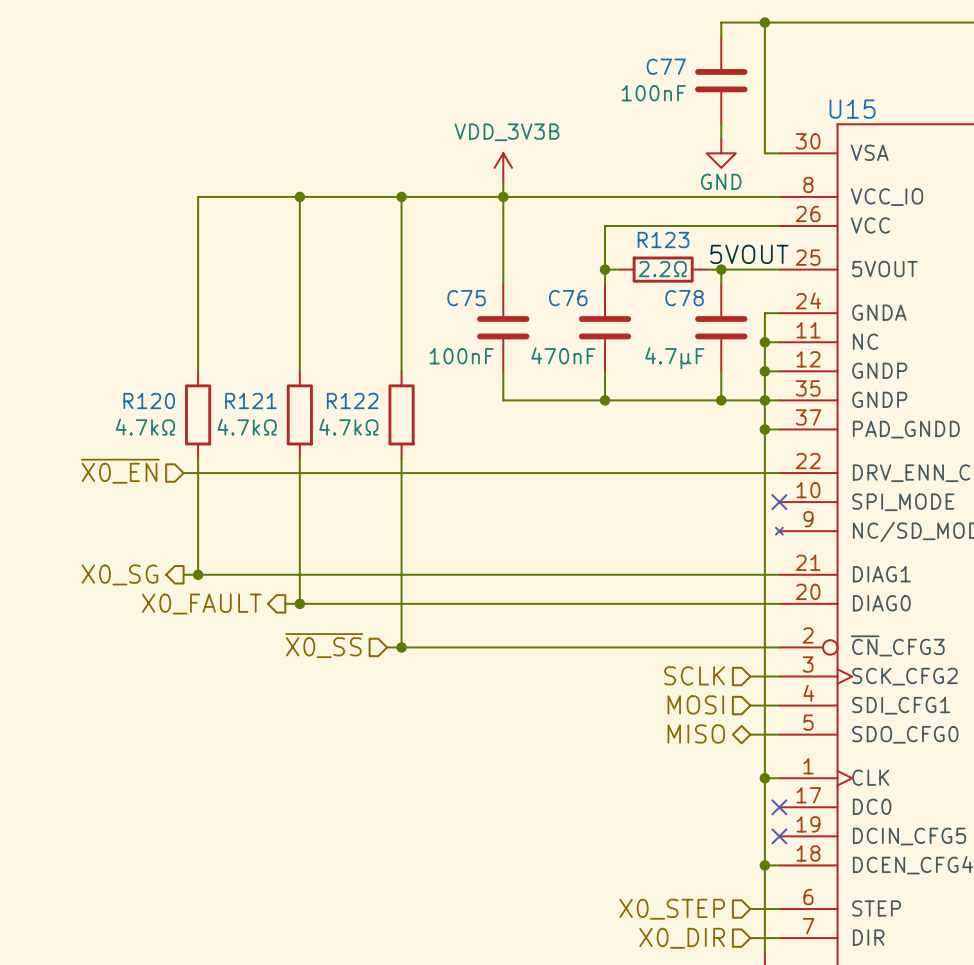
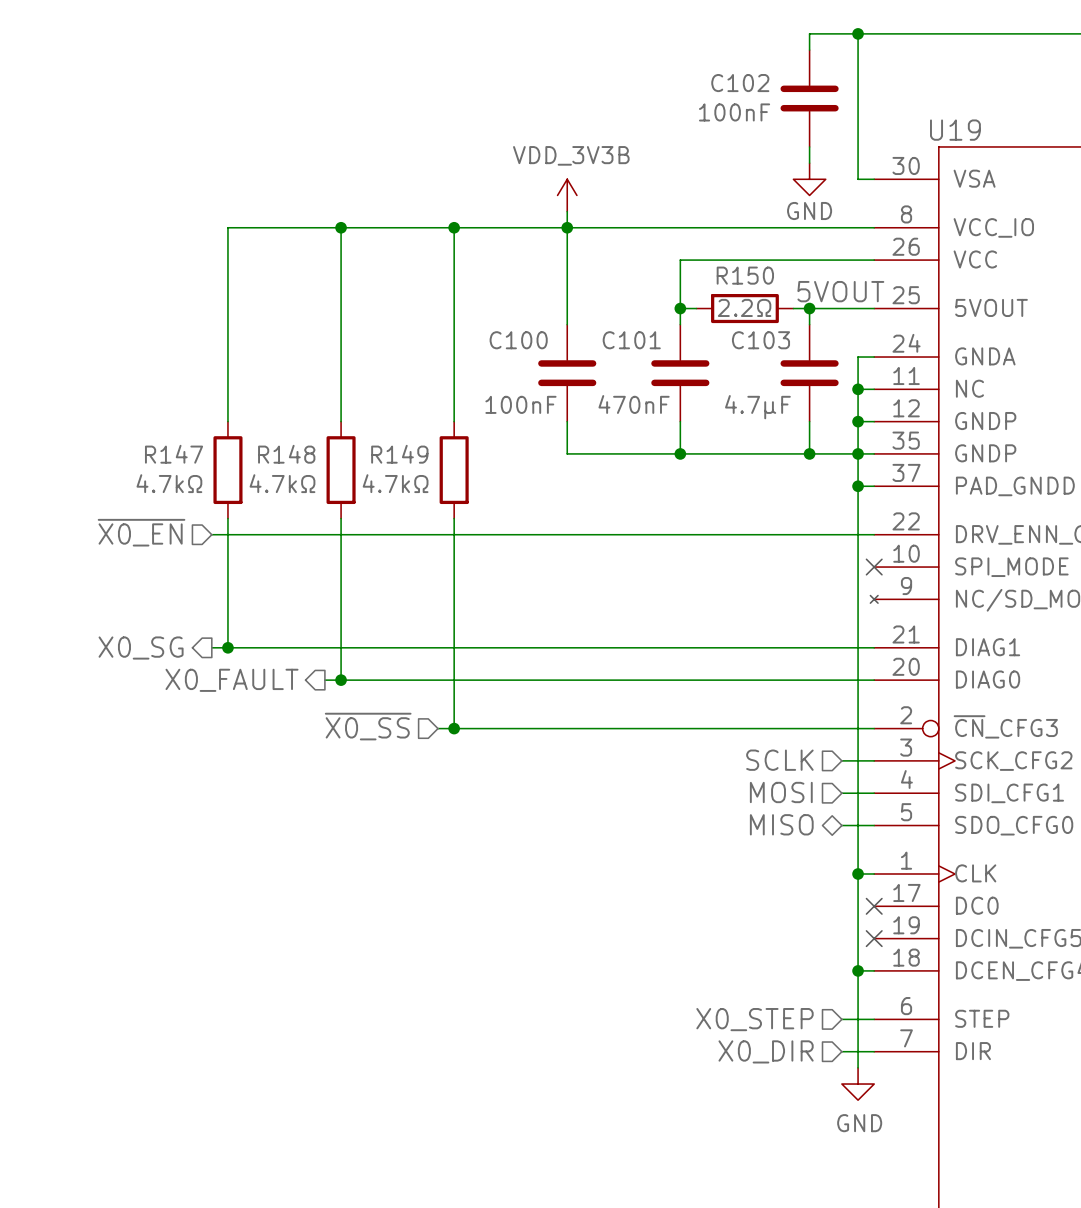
C77 name: C77 (666, 66) -> C102 (740, 83)
U15 name: U15 (852, 109) -> U19 (955, 130)
R123 name: R123 (663, 239) -> R150 (745, 275)
C75 name: C75 (466, 298) -> C100 (518, 340)
C76 name: C76 (568, 298) -> C101 (631, 340)
C78 name: C78 (684, 298) -> C103 (760, 340)
R120 name: R120 (149, 401) -> R147 (174, 454)
R121 name: R121 (250, 401) -> R148 (286, 454)
R122 name: R122 (352, 401) -> R149 (399, 454)

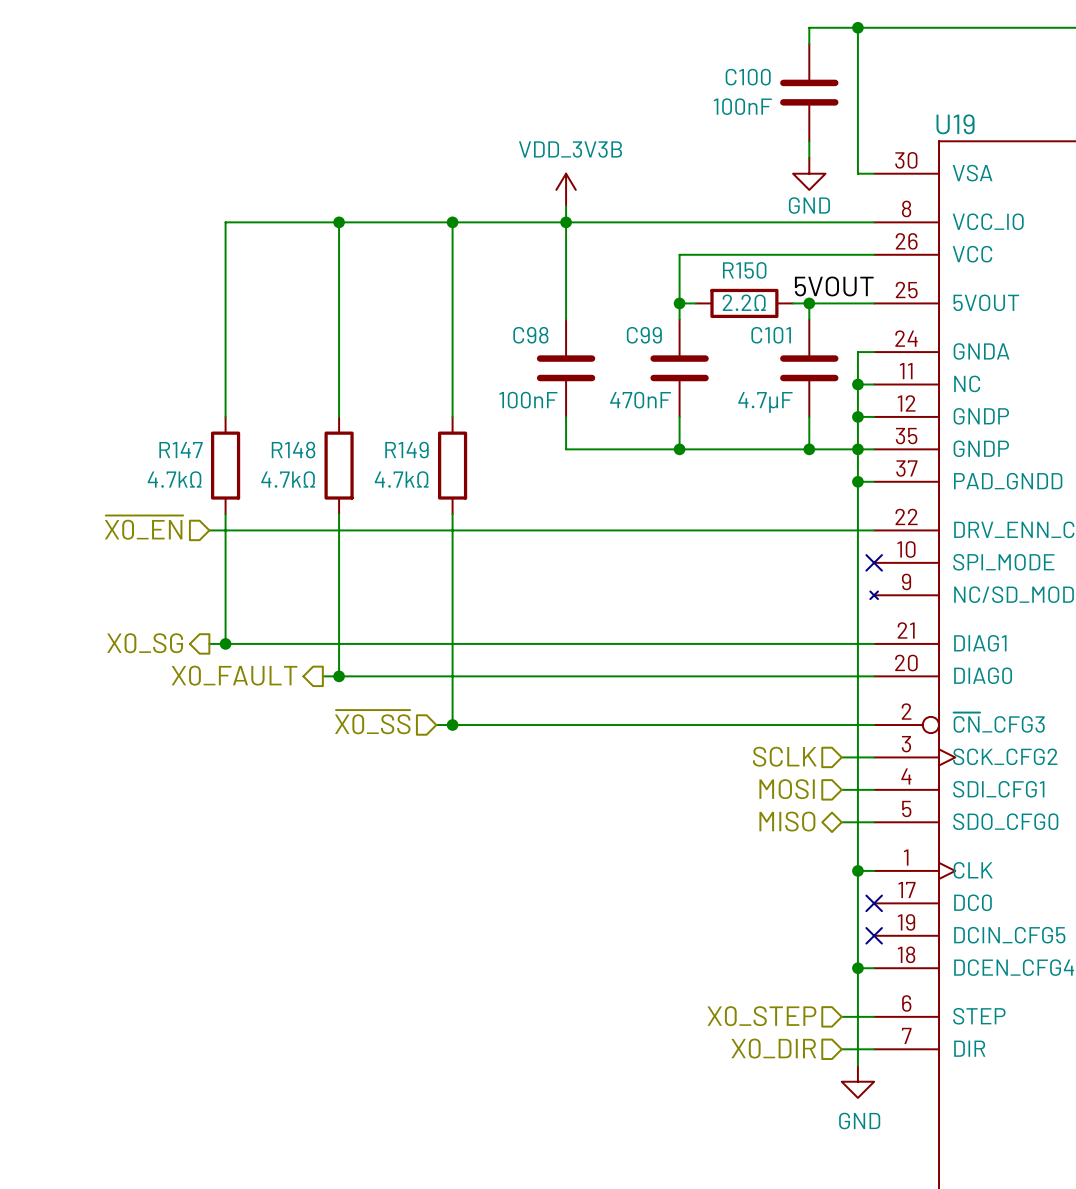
C102 name: C102 (740, 83) -> C100 (748, 77)
C100 name: C100 (518, 340) -> C98 (530, 335)
C101 name: C101 (631, 340) -> C99 (644, 335)
C103 name: C103 (760, 340) -> C101 (771, 335)

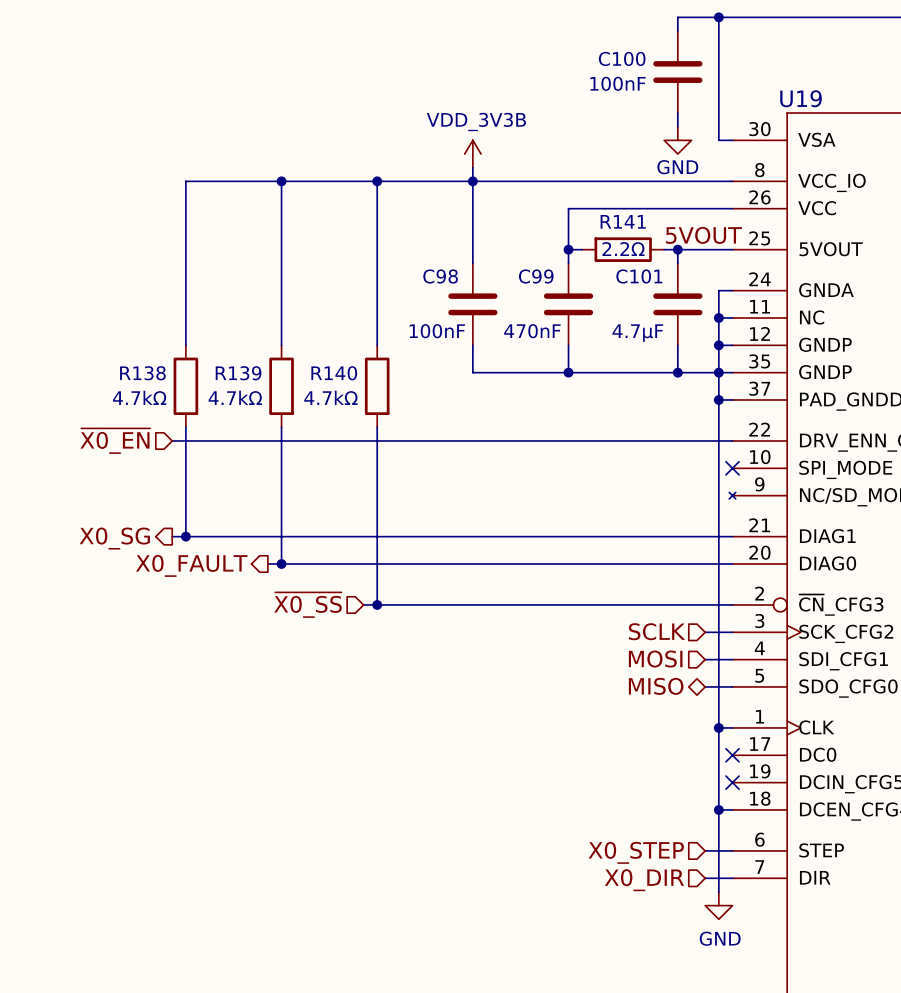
R150 name: R150 (744, 270) -> R141 (623, 221)
R147 name: R147 (181, 450) -> R138 (142, 373)
R148 name: R148 (293, 450) -> R139 (238, 373)
R149 name: R149 (406, 450) -> R140 (334, 373)

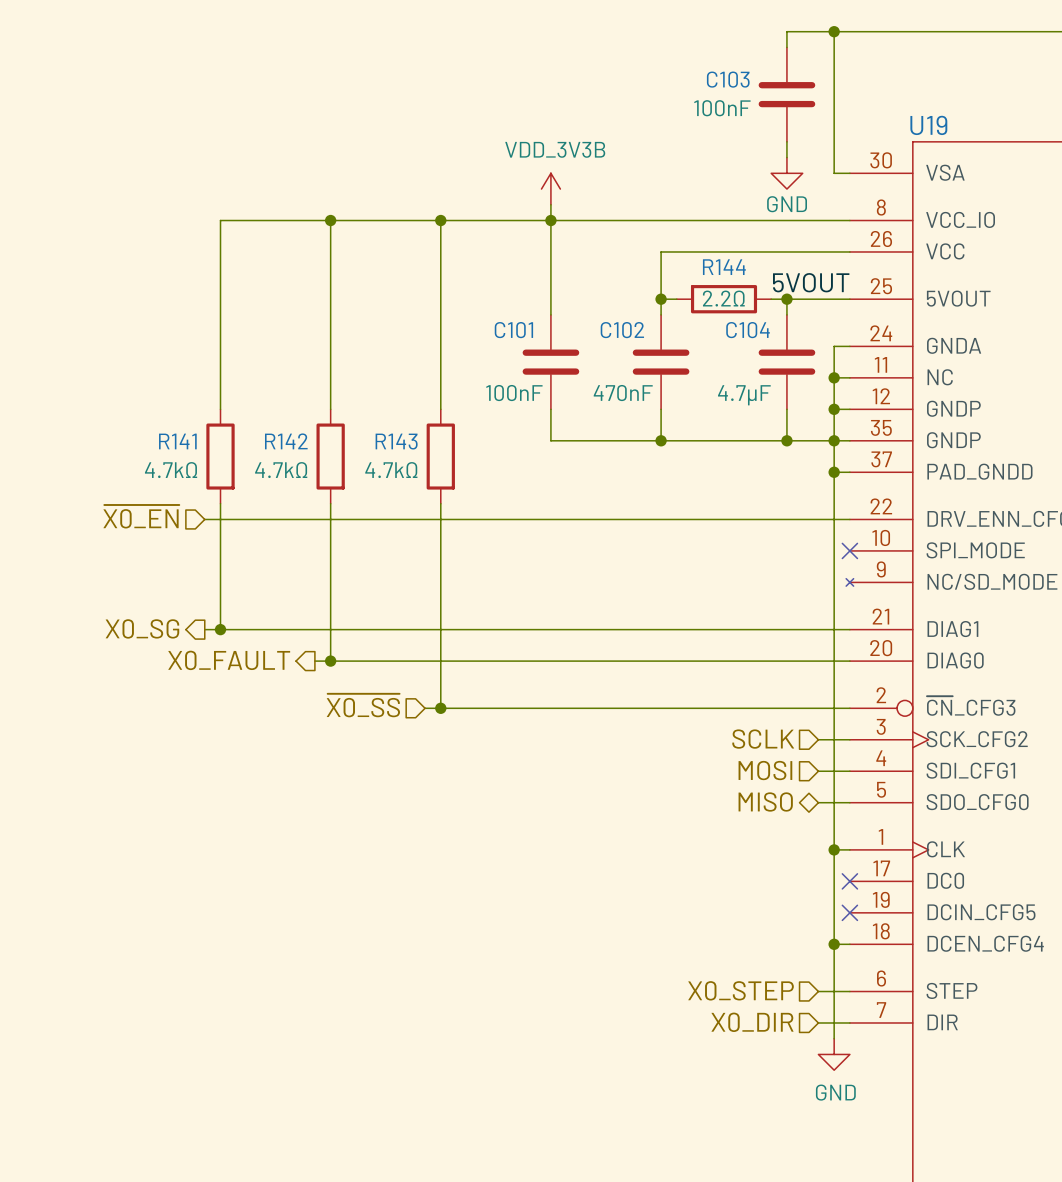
C100 name: C100 (622, 58) -> C103 (728, 79)
R141 name: R141 (623, 221) -> R144 (724, 267)
C98 name: C98 (440, 276) -> C101 (513, 330)
C99 name: C99 (536, 276) -> C102 (622, 330)
C101 name: C101 (639, 276) -> C104 (748, 330)
R138 name: R138 (142, 373) -> R141 (177, 441)
R139 name: R139 (238, 373) -> R142 (286, 441)
R140 name: R140 (334, 373) -> R143 (396, 441)

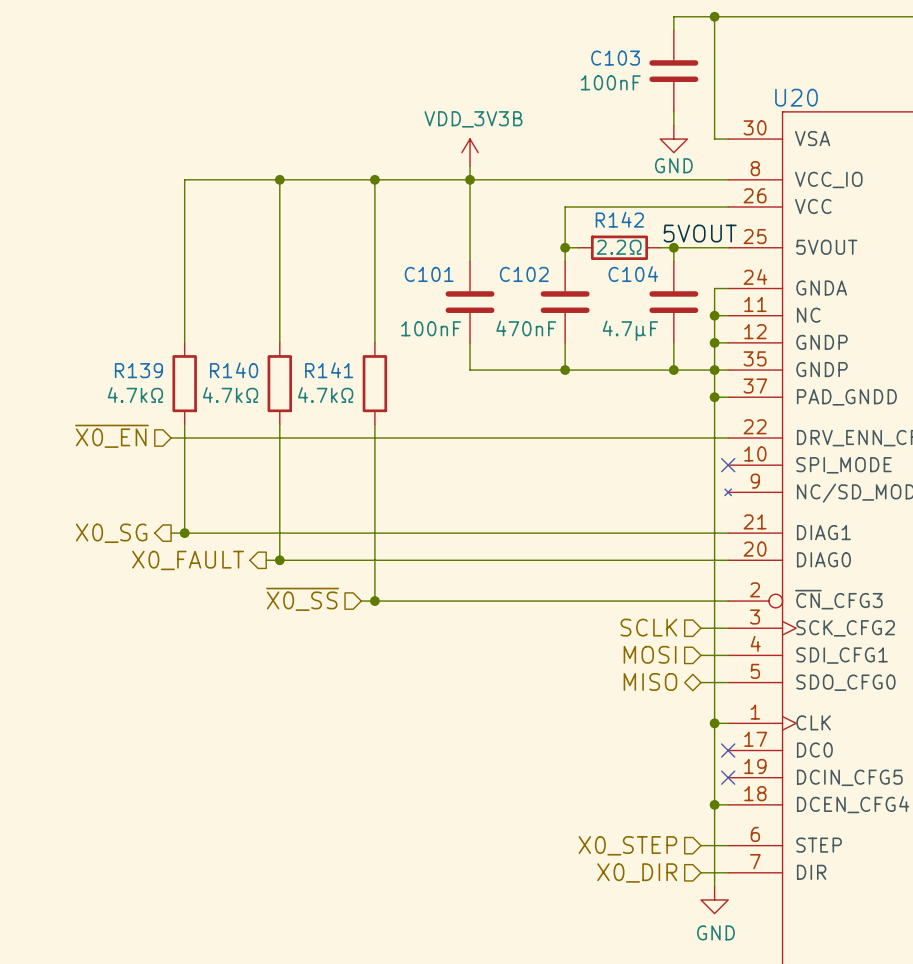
U19 name: U19 (928, 125) -> U20 (796, 97)
R144 name: R144 (724, 267) -> R142 (619, 219)
R141 name: R141 (177, 441) -> R139 (138, 370)
R142 name: R142 (286, 441) -> R140 (234, 370)
R143 name: R143 (396, 441) -> R141 (329, 370)

